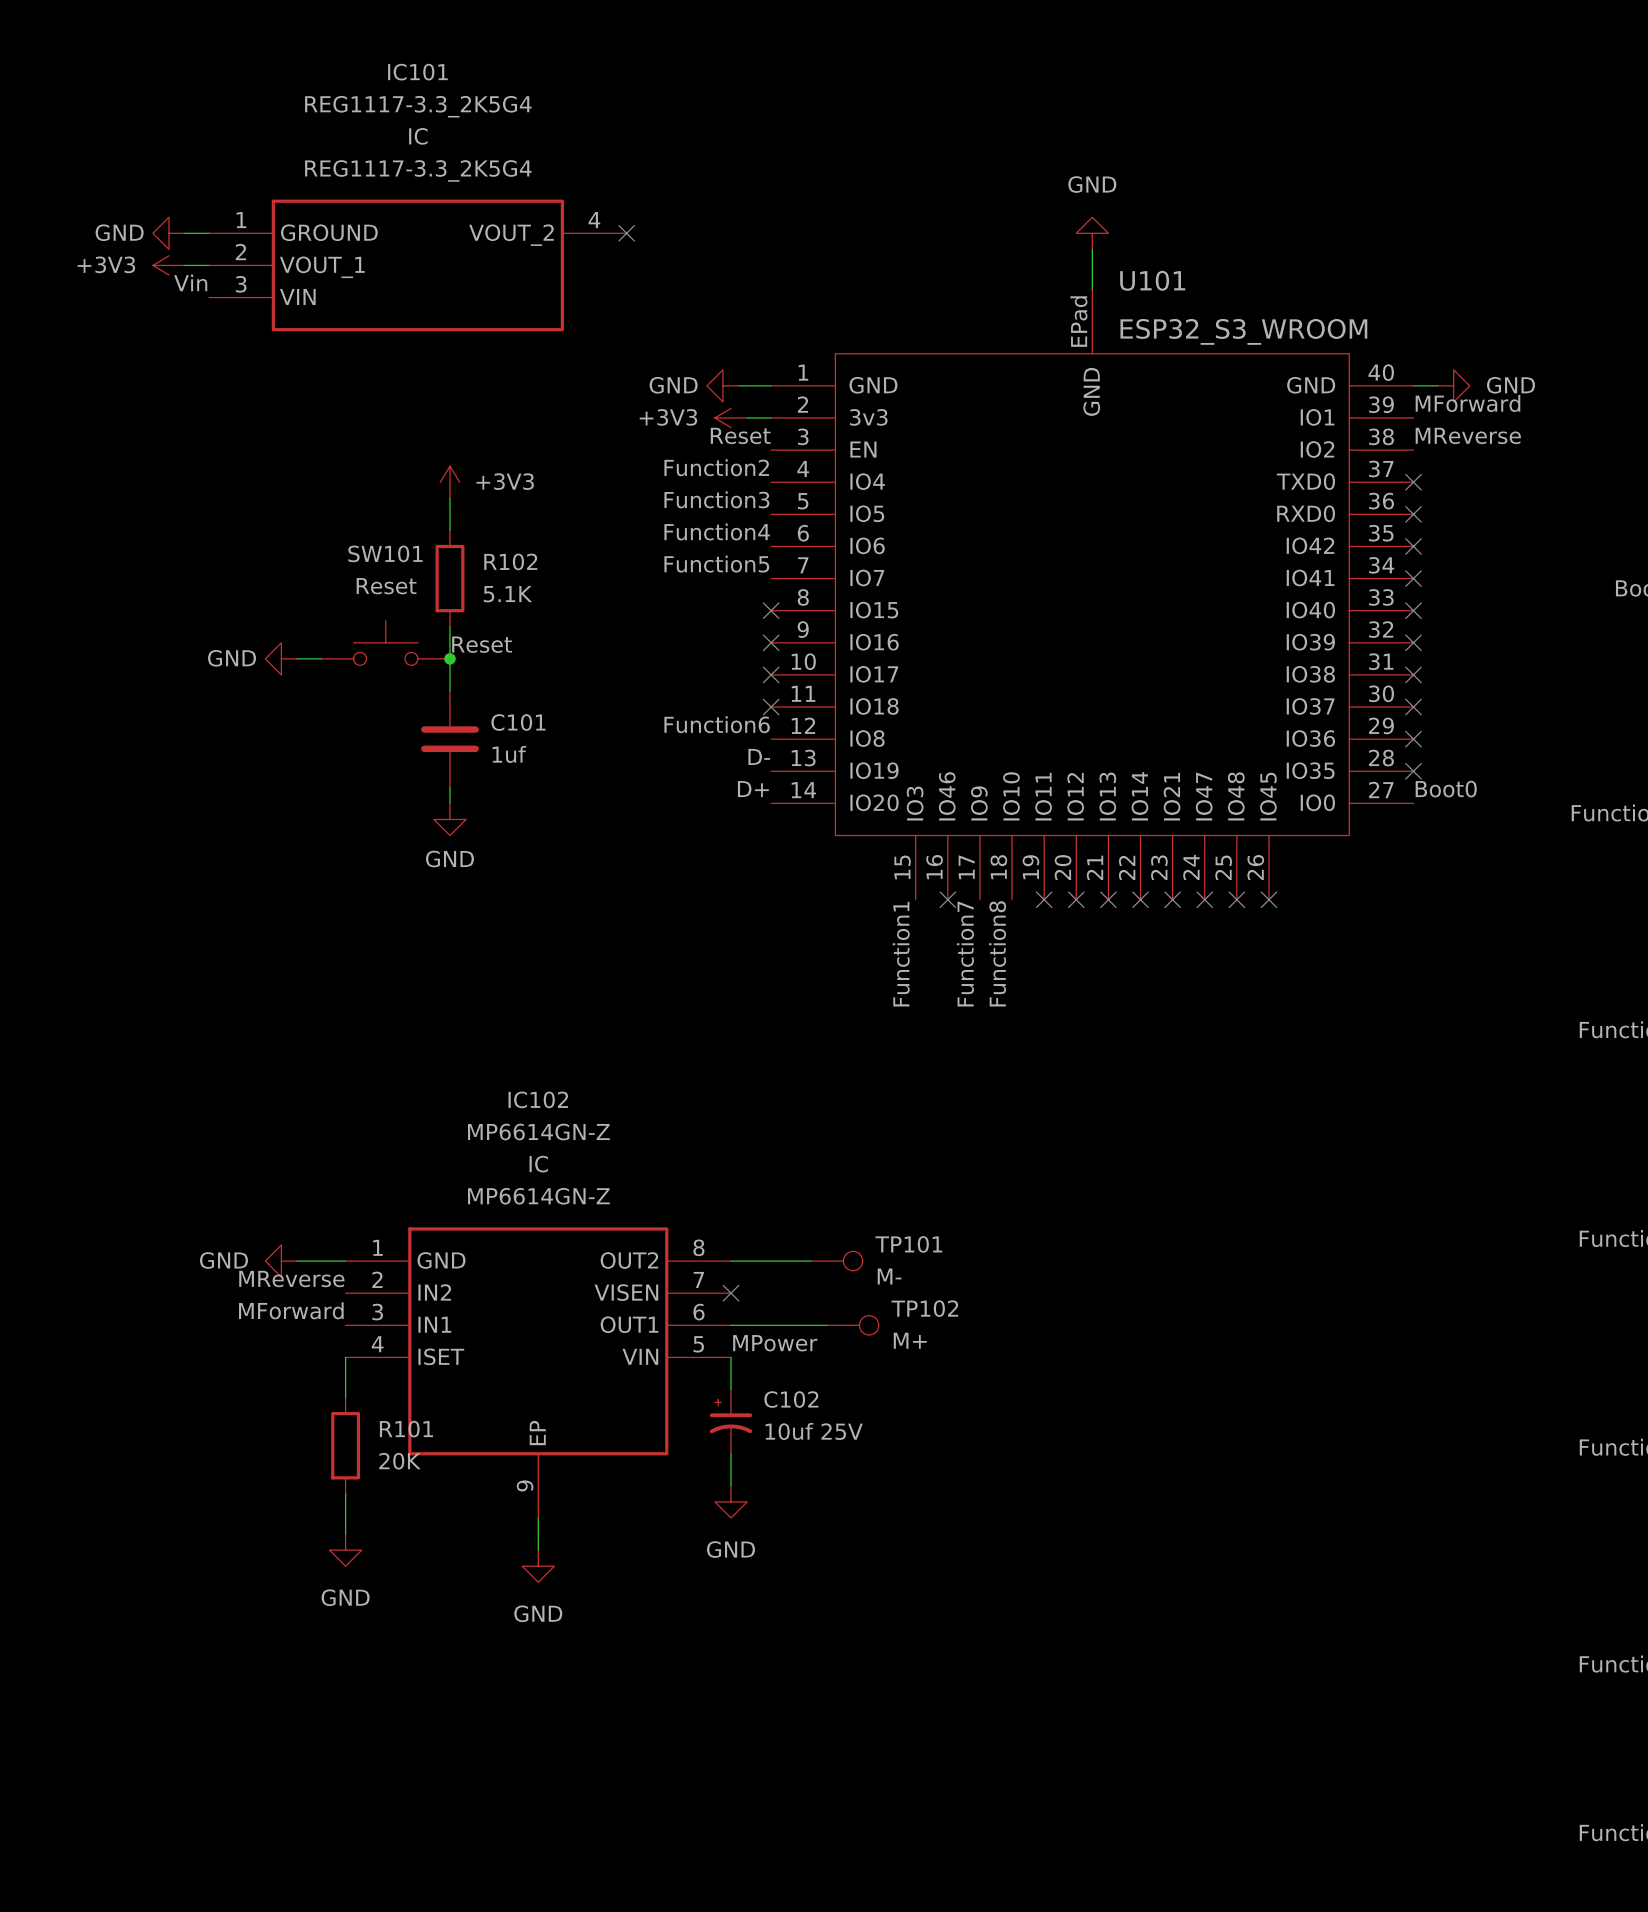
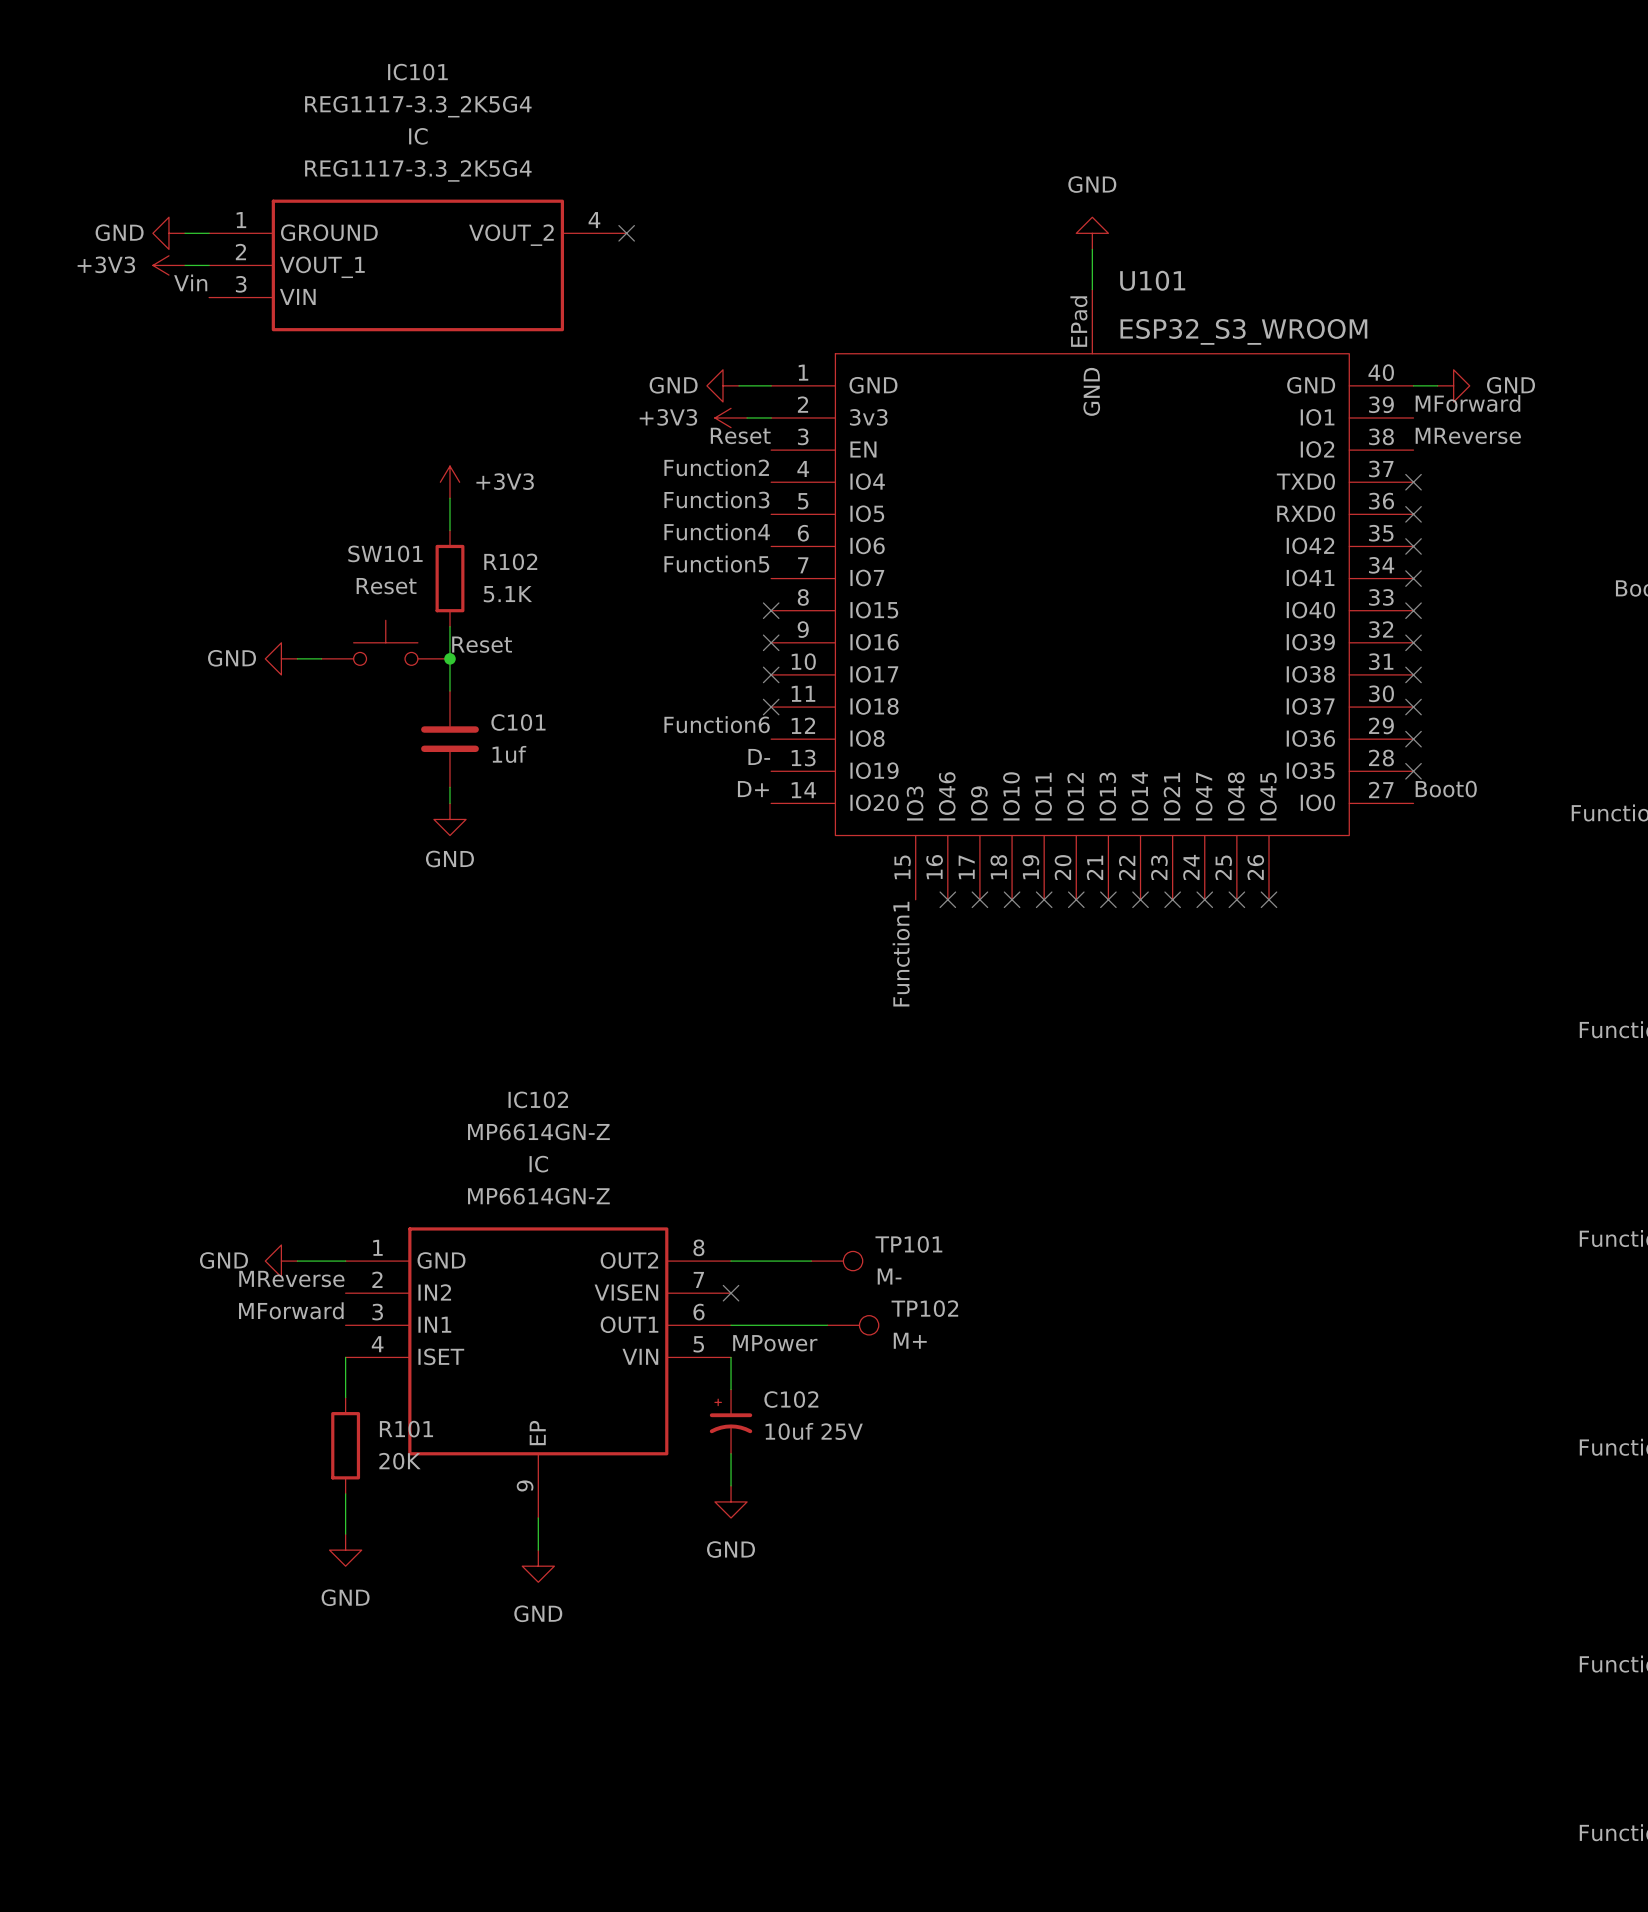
no-connect mark: none -> (979, 899)
no-connect mark: none -> (1012, 899)
label: Function8 (997, 953) -> none
label: Function7 (965, 954) -> none

